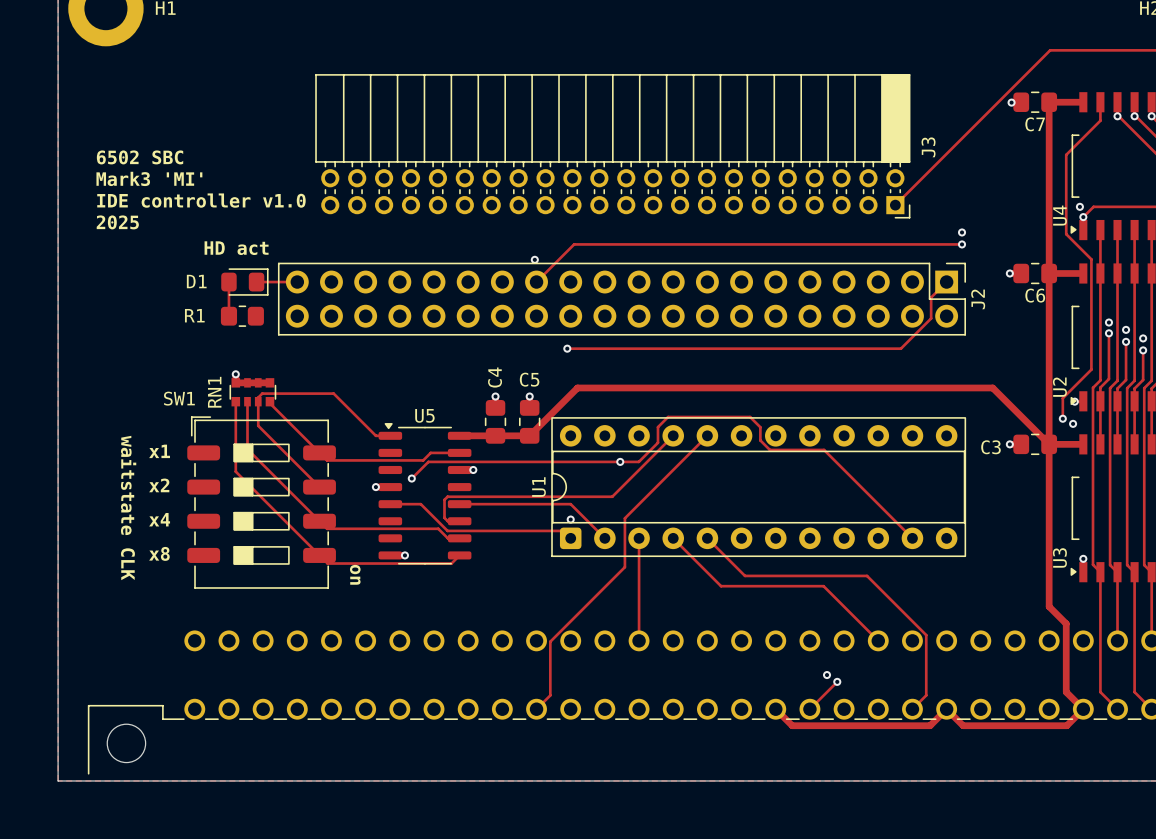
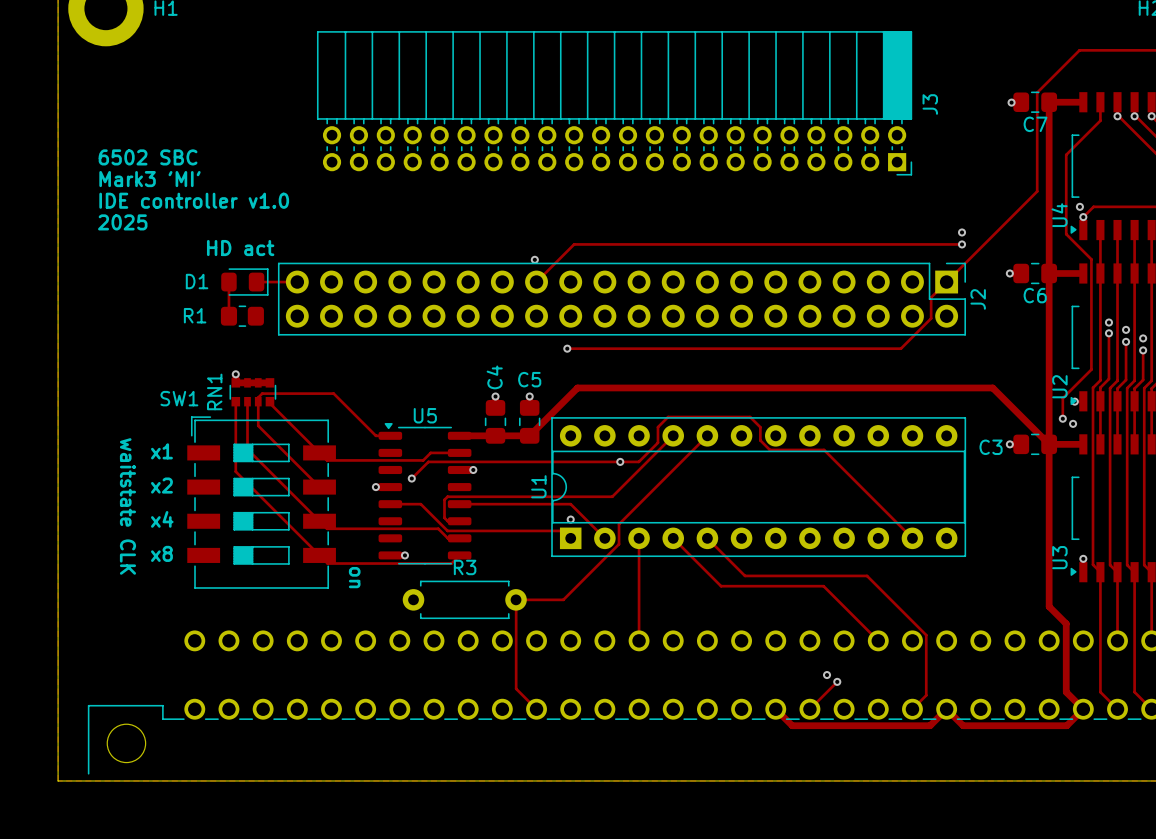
track: (1079, 50) (1050, 50) (895, 205) -> (1079, 50) (1037, 92) (1037, 191) (946, 282)
J3 position: (612, 146) -> (614, 103)
SW1 footprint: [187, 416, 336, 589] -> [187, 416, 336, 589]
U1 footprint: [551, 417, 967, 558] -> [551, 417, 967, 558]
track: (624, 518) (624, 567) (550, 641) (550, 695) (536, 709) -> (624, 518) (619, 524) (619, 544) (563, 599) (516, 599)
R3: none -> (464, 599)
track: none -> (516, 599) (516, 688) (536, 709)

